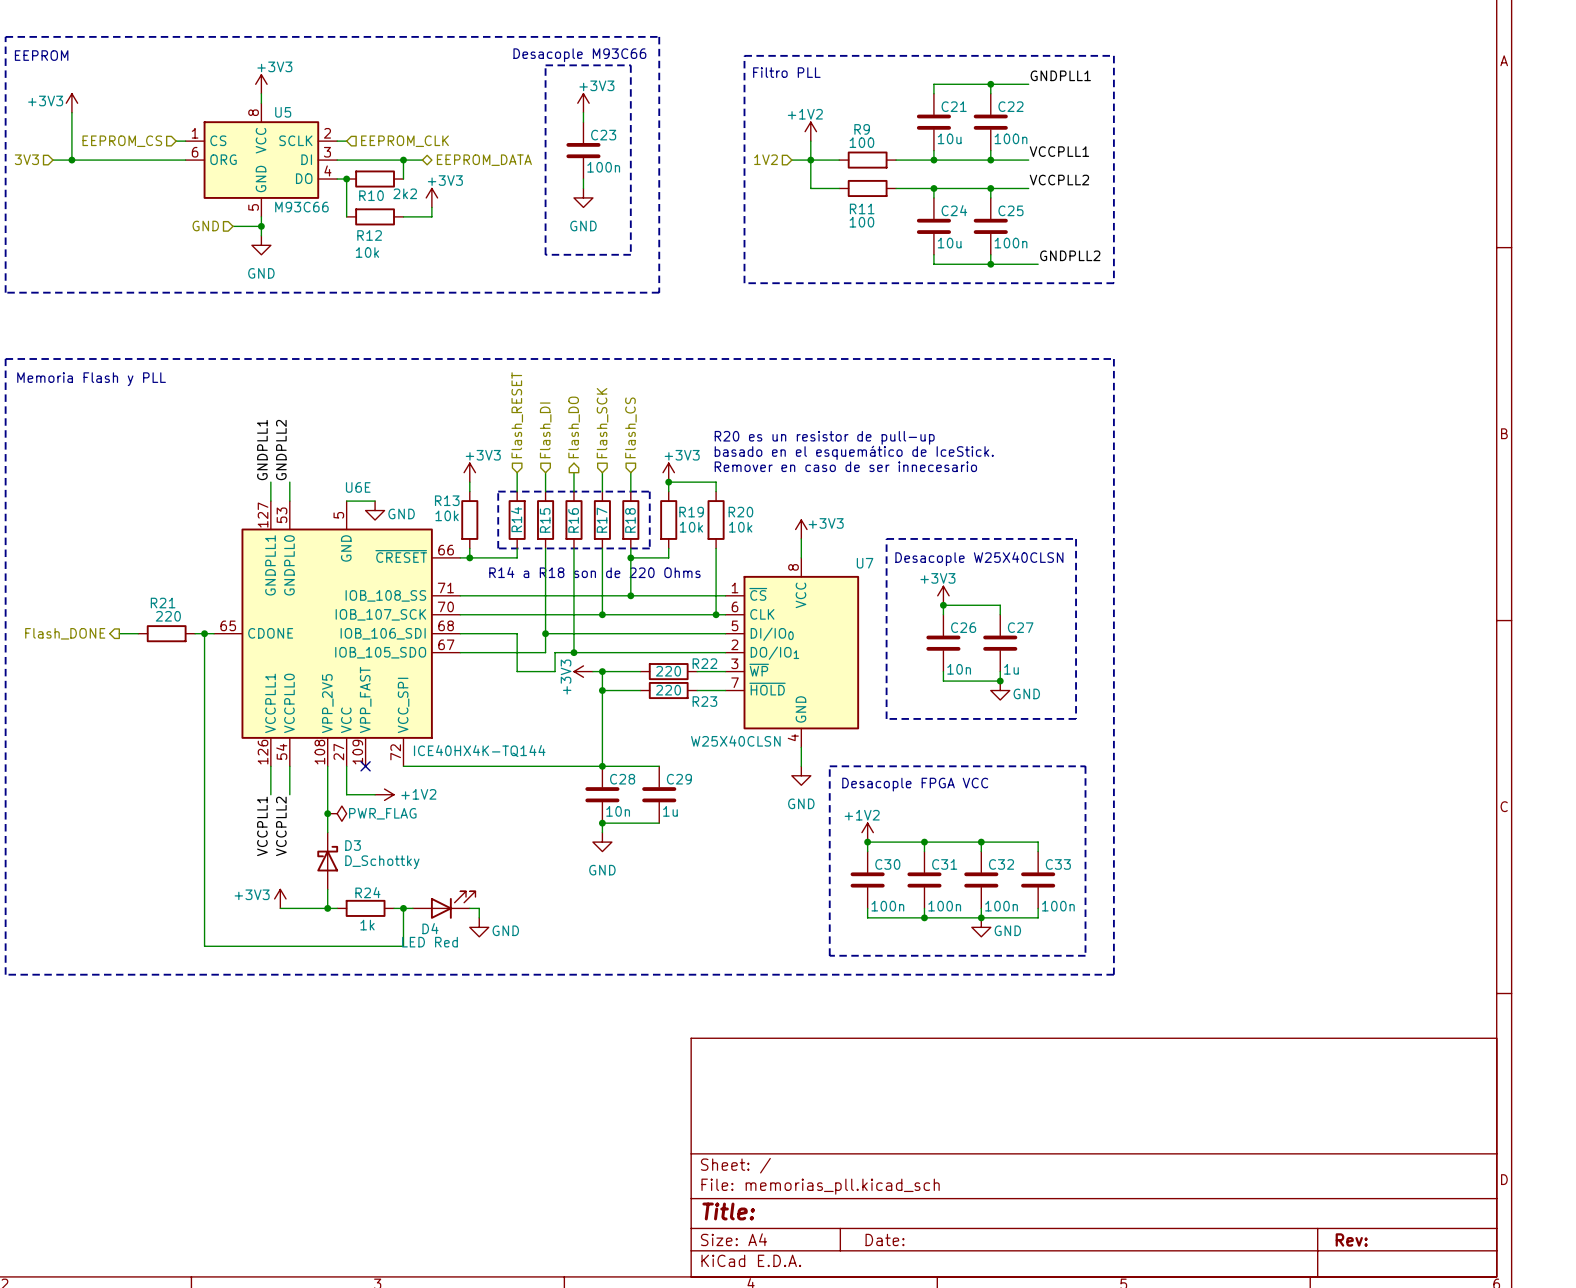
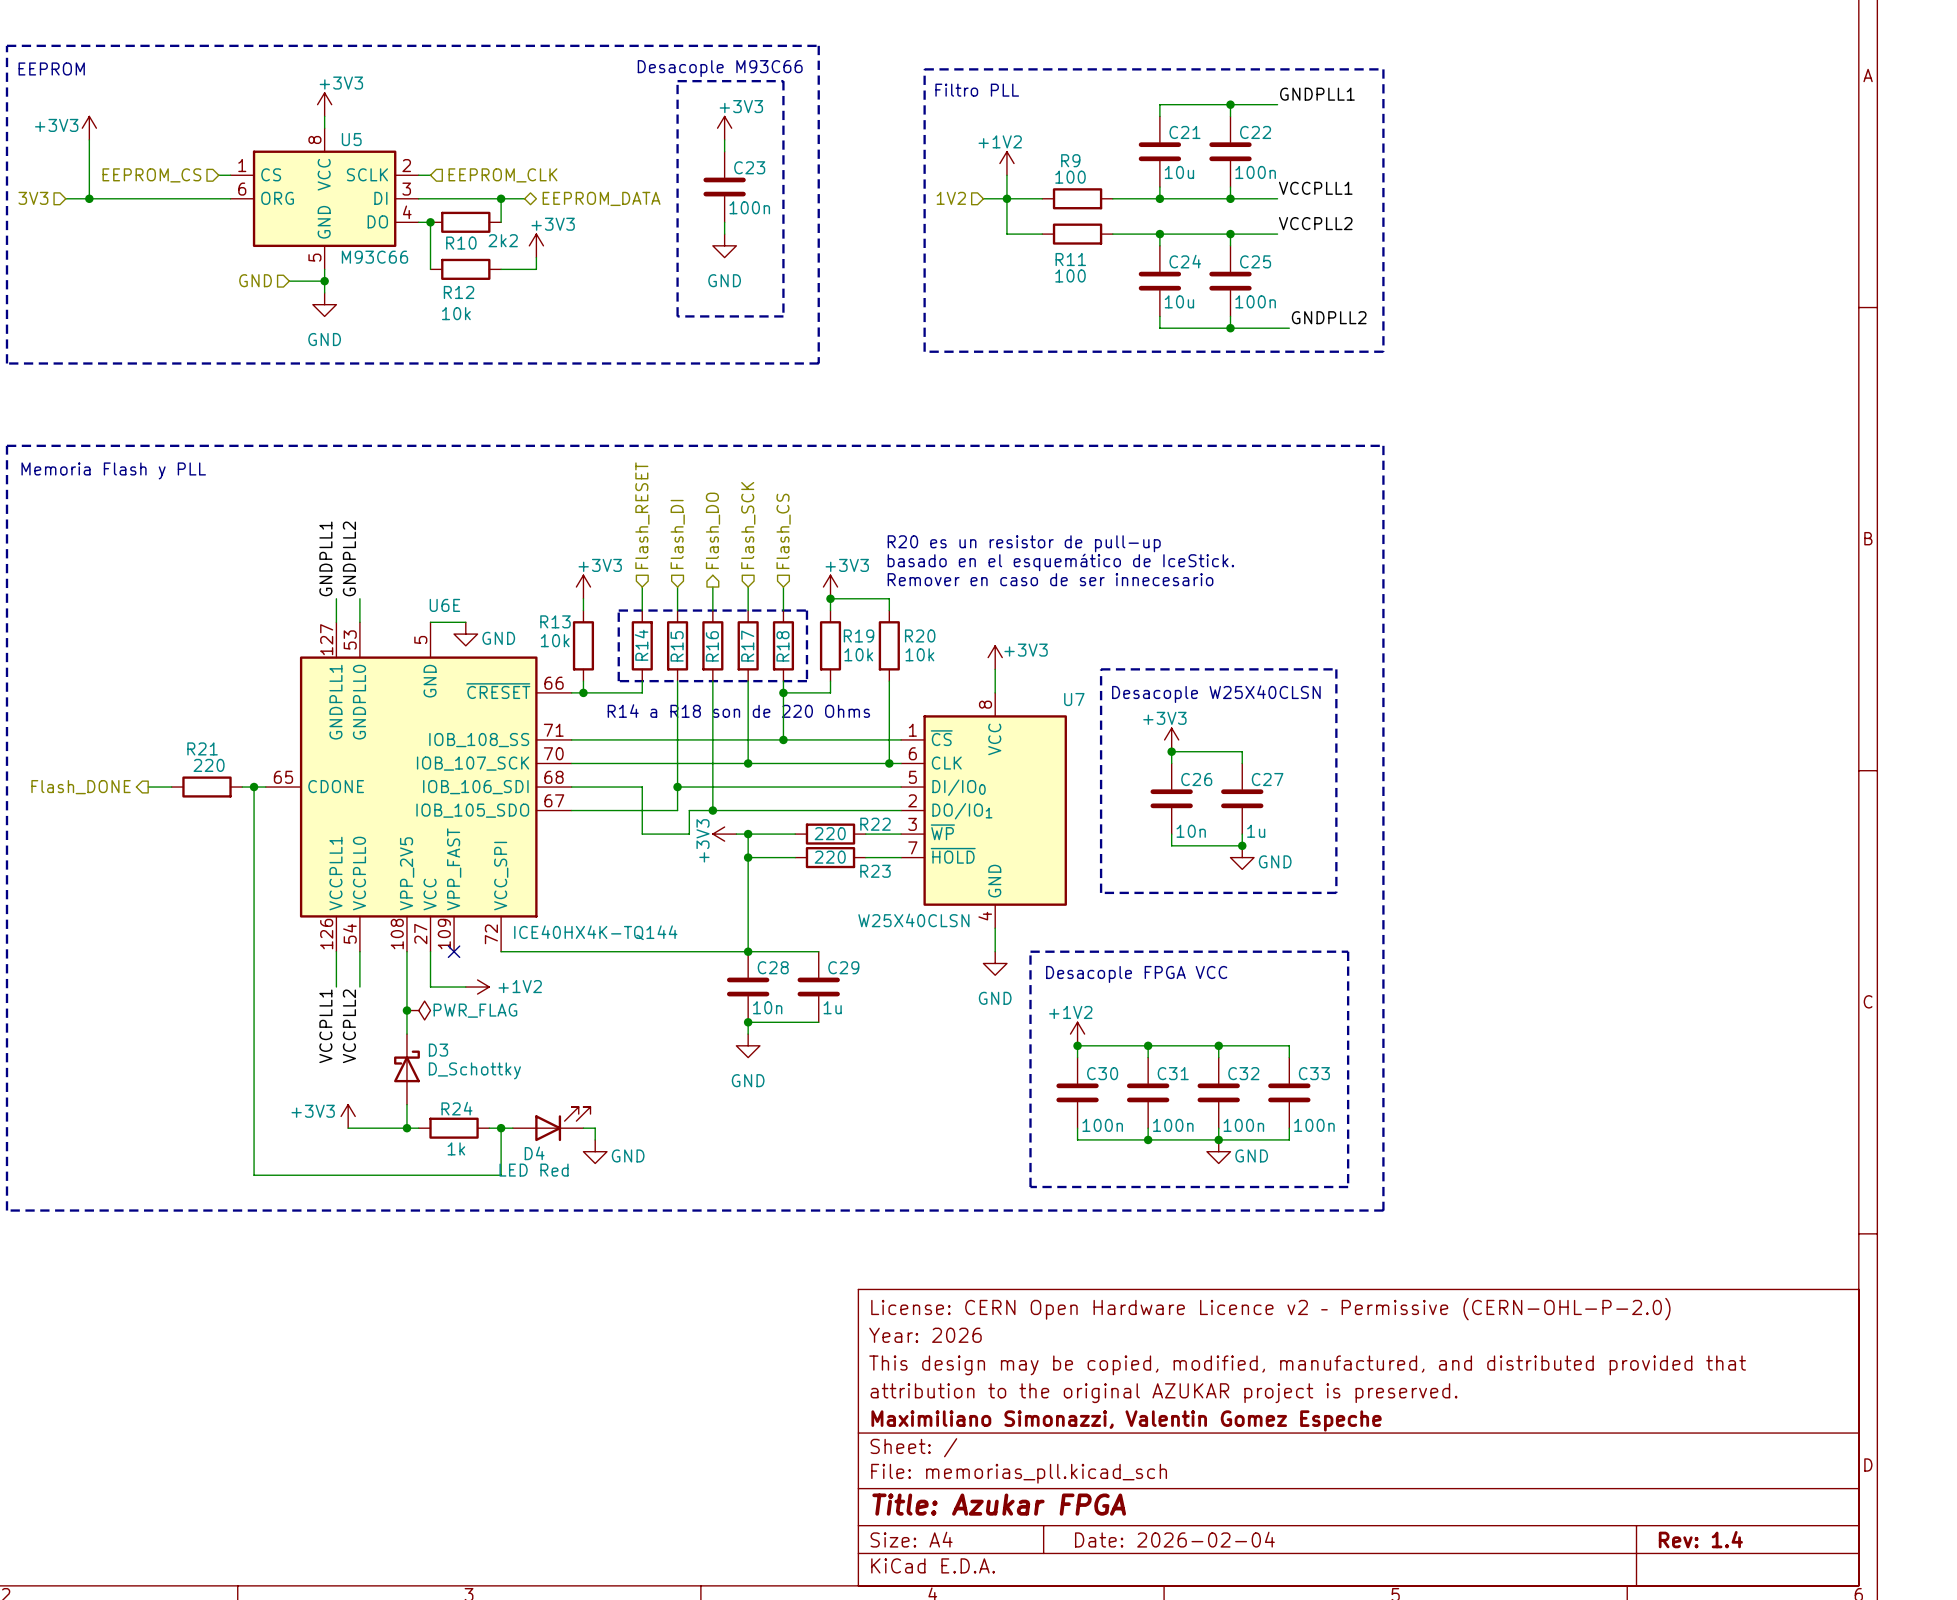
title block: none -> License: CERN Open Hardware Licence v2 – Permissive (CERN-OHL-P-2.0) (1270, 1309)
title block: none -> Year: 2026 (925, 1335)
title block: none -> This design may be copied, modified, manufactured, and distributed provided that (1307, 1365)
title block: none -> attribution to the original AZUKAR project is preserved. (1164, 1393)
title block: none -> Maximiliano Simonazzi, Valentin Gomez Espeche (1126, 1420)
title block: Title: (728, 1211) -> Title: Azukar FPGA (999, 1504)
title block: Date: (885, 1239) -> Date: 2026-02-04 (1174, 1539)
title block: Rev: (1351, 1239) -> Rev: 1.4 (1700, 1539)

